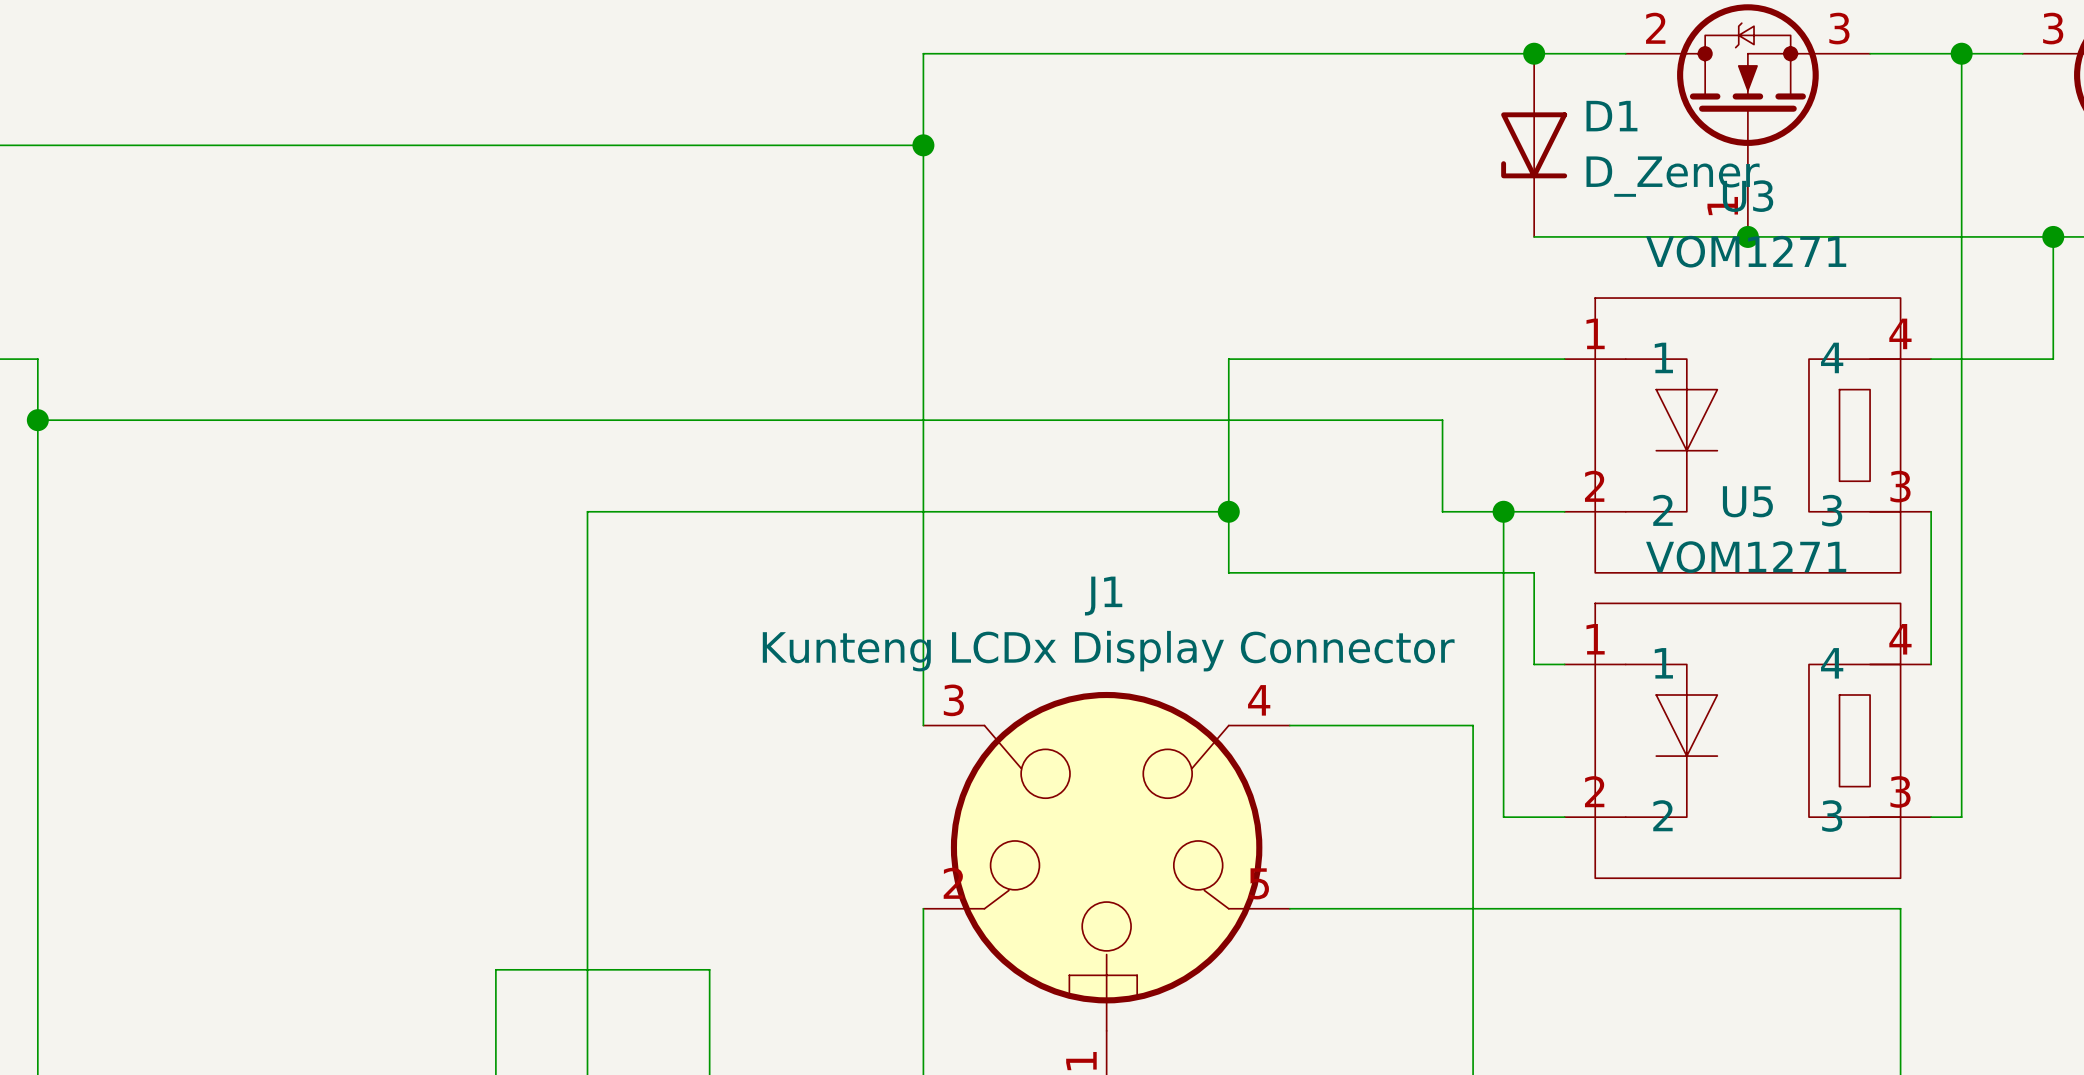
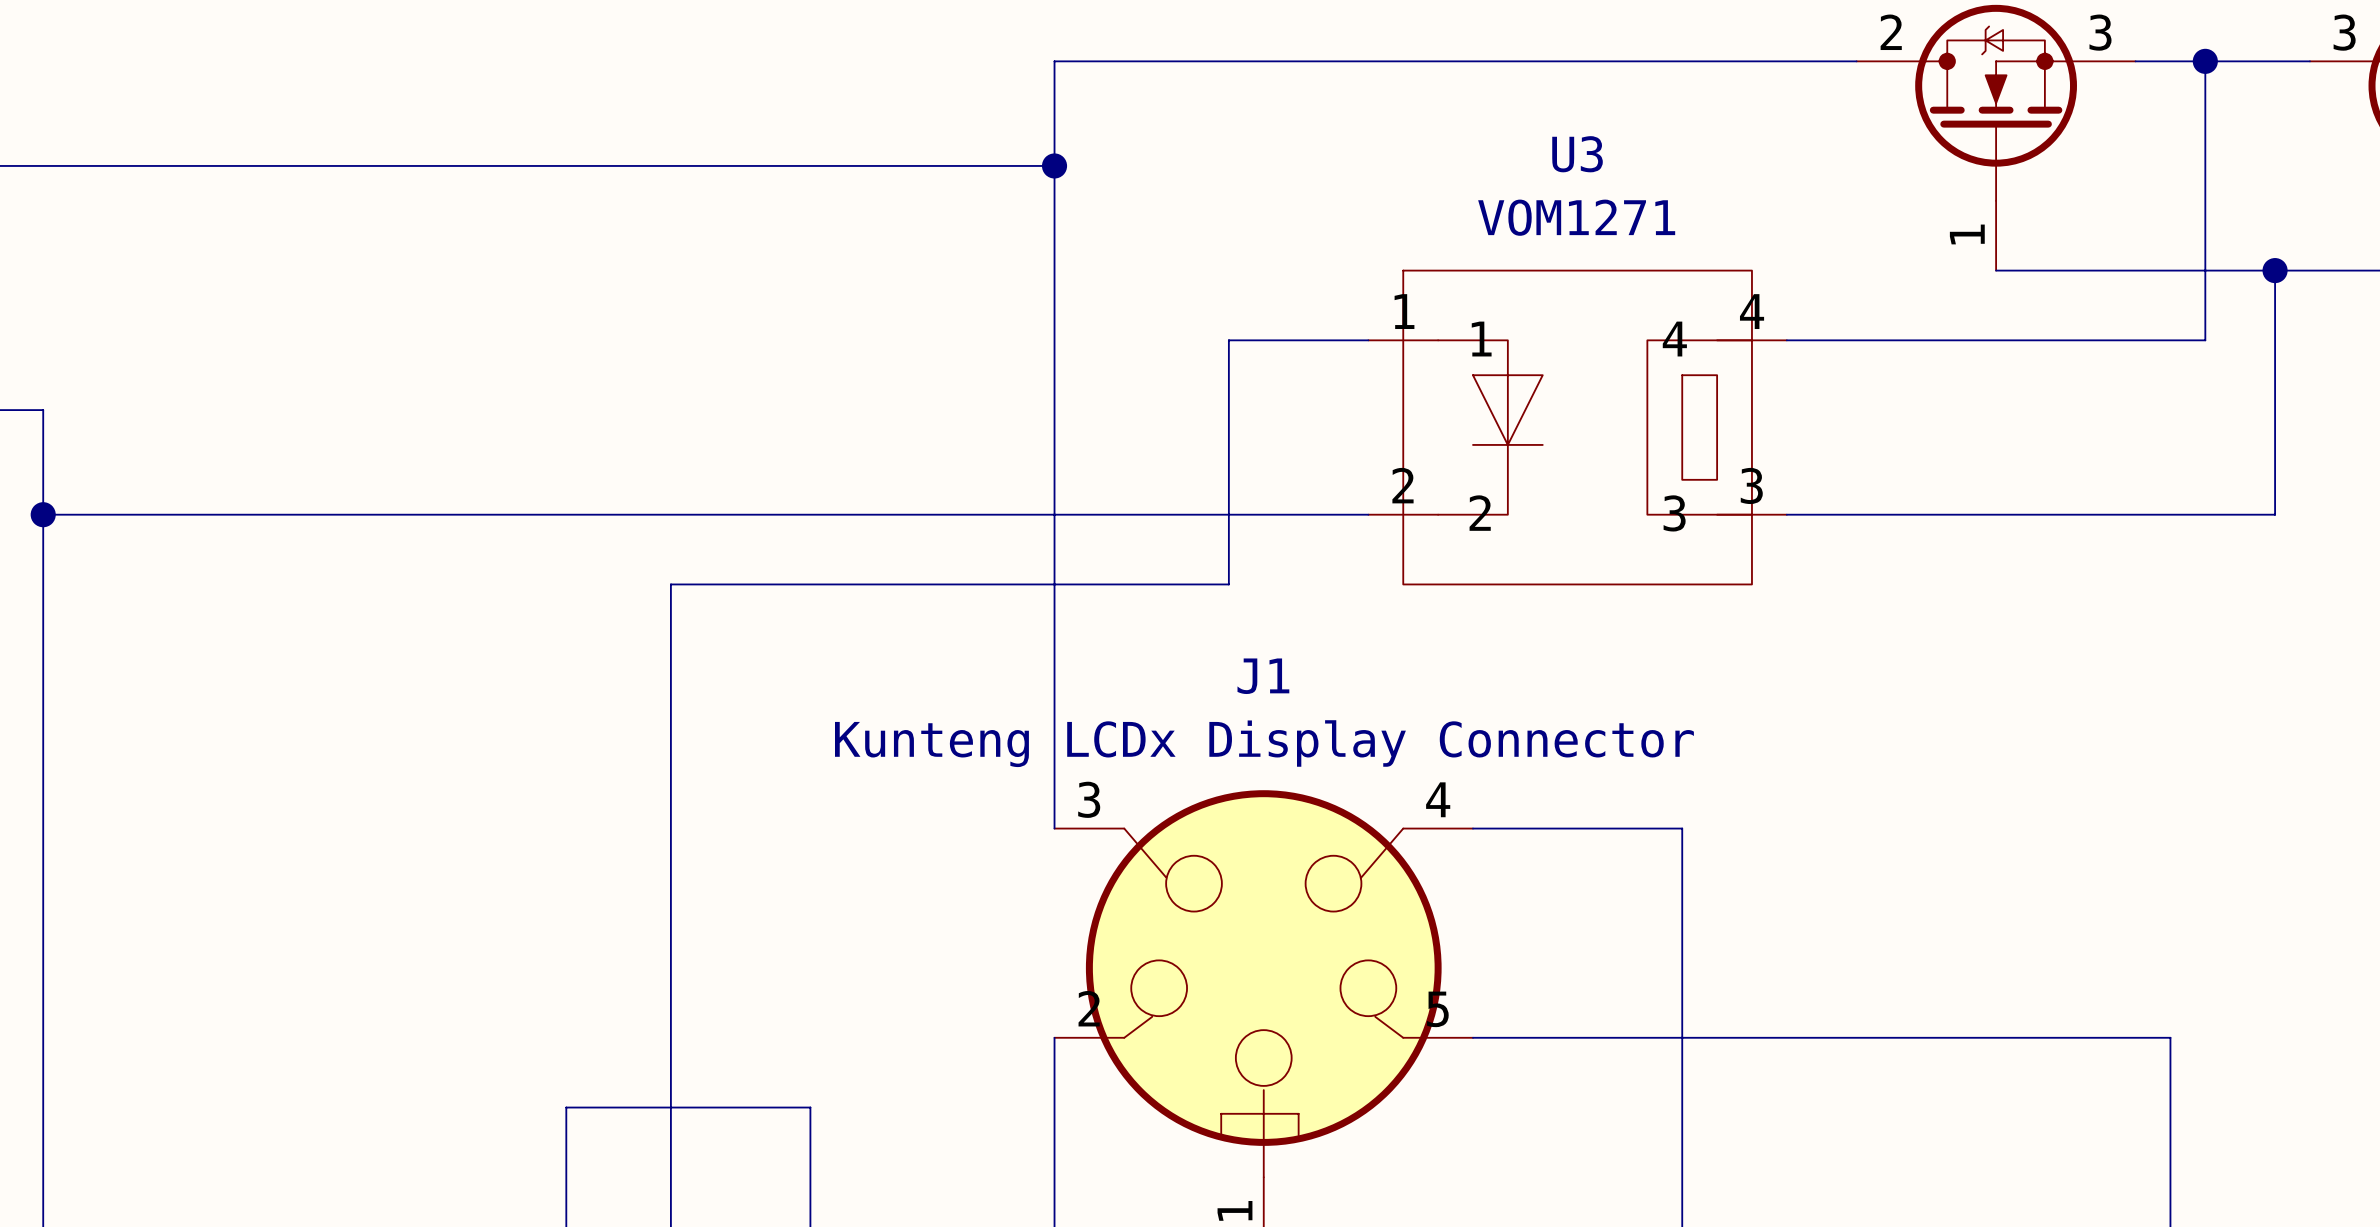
junction: (1534, 53) -> none
wire: none -> (2205, 61) (2205, 340) (1786, 340)
wire: (1961, 53) (1961, 817) (1931, 817) -> none
junction position: (1961, 53) -> (2205, 61)
D1: D_Zener (1534, 145) -> none
wire: (1534, 236) (1747, 236) -> none
junction: (1747, 236) -> none
wire: none -> (2275, 270) (2275, 514) (1786, 514)
wire: (2053, 236) (2053, 359) (1931, 359) -> none
junction position: (2053, 236) -> (2275, 270)
wire: (1564, 359) (1228, 359) (1228, 572) (1534, 572) (1534, 664) (1564, 664) -> none
wire: (37, 420) (1442, 420) (1442, 511) (1564, 511) -> none
junction position: (37, 420) -> (43, 514)
U3 position: (1747, 435) -> (1577, 427)
wire: none -> (43, 514) (1368, 514)
wire: (1076, 511) (1228, 511) -> (1228, 584) (1228, 340) (1368, 340)
junction: (1228, 511) -> none
wire: (1503, 511) (1503, 817) (1564, 817) -> none
junction: (1503, 511) -> none
wire: (1931, 511) (1931, 664) -> none
U5: VOM1271 (1747, 740) -> none

